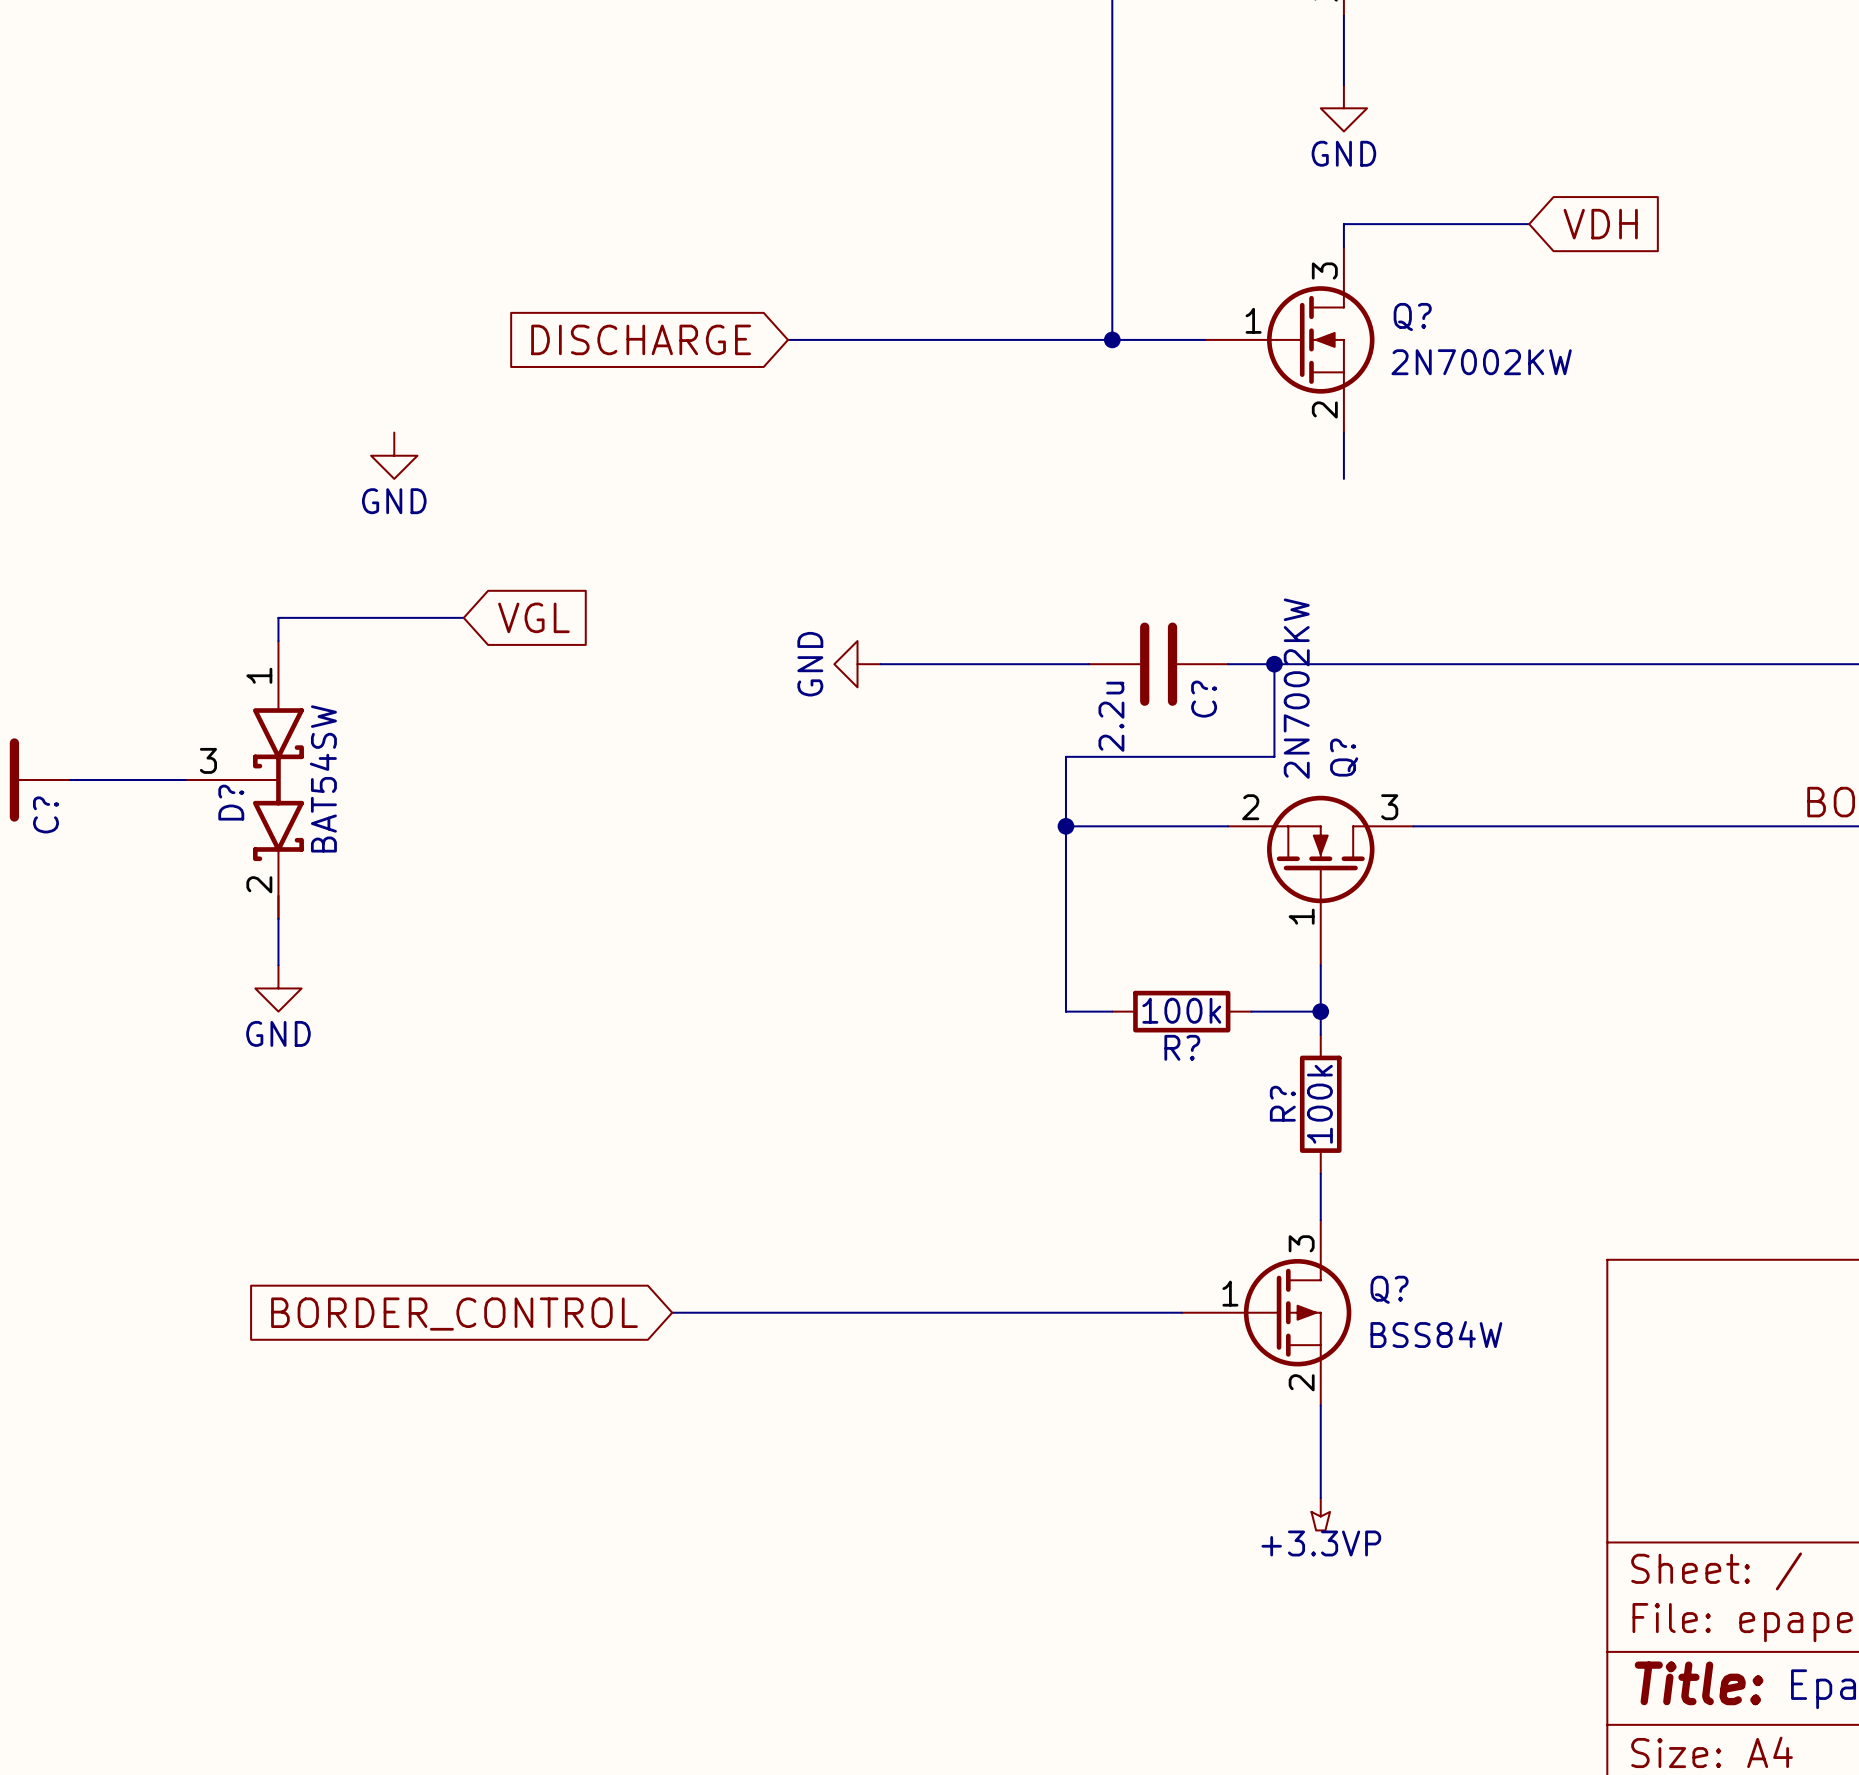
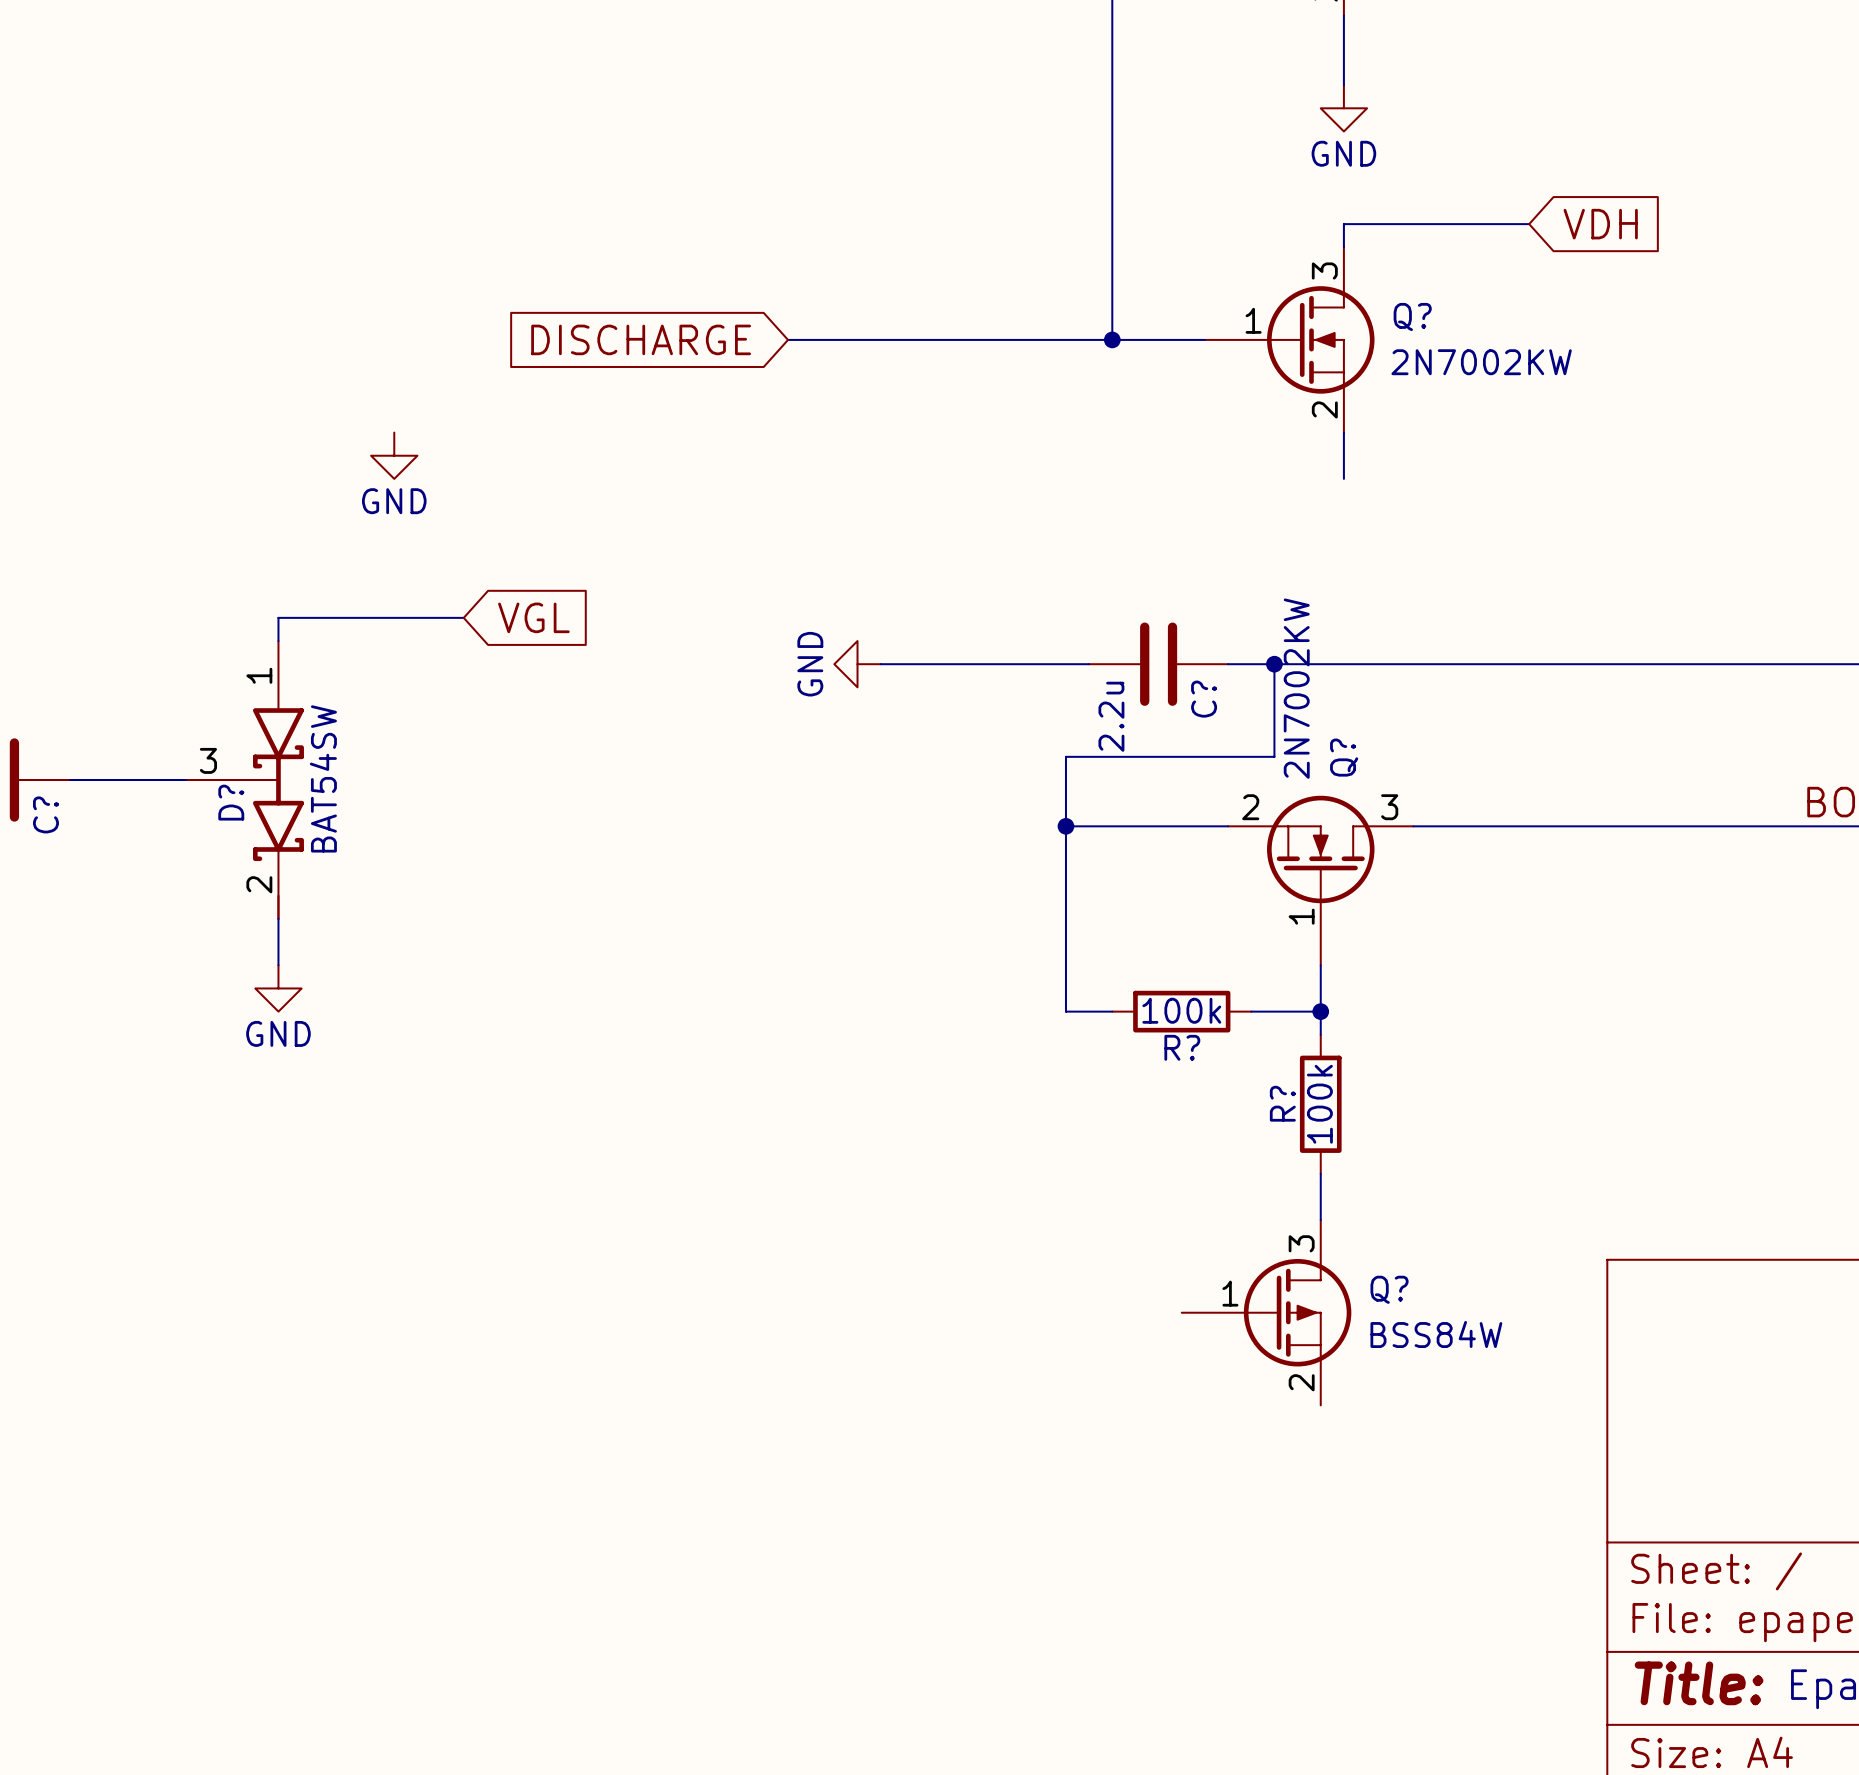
wire: (672, 1312) (1181, 1312) -> none
global label: BORDER_CONTROL (454, 1314) -> none
wire: (1320, 1405) (1320, 1498) -> none
power symbol: +3.3VP (1320, 1514) -> none

